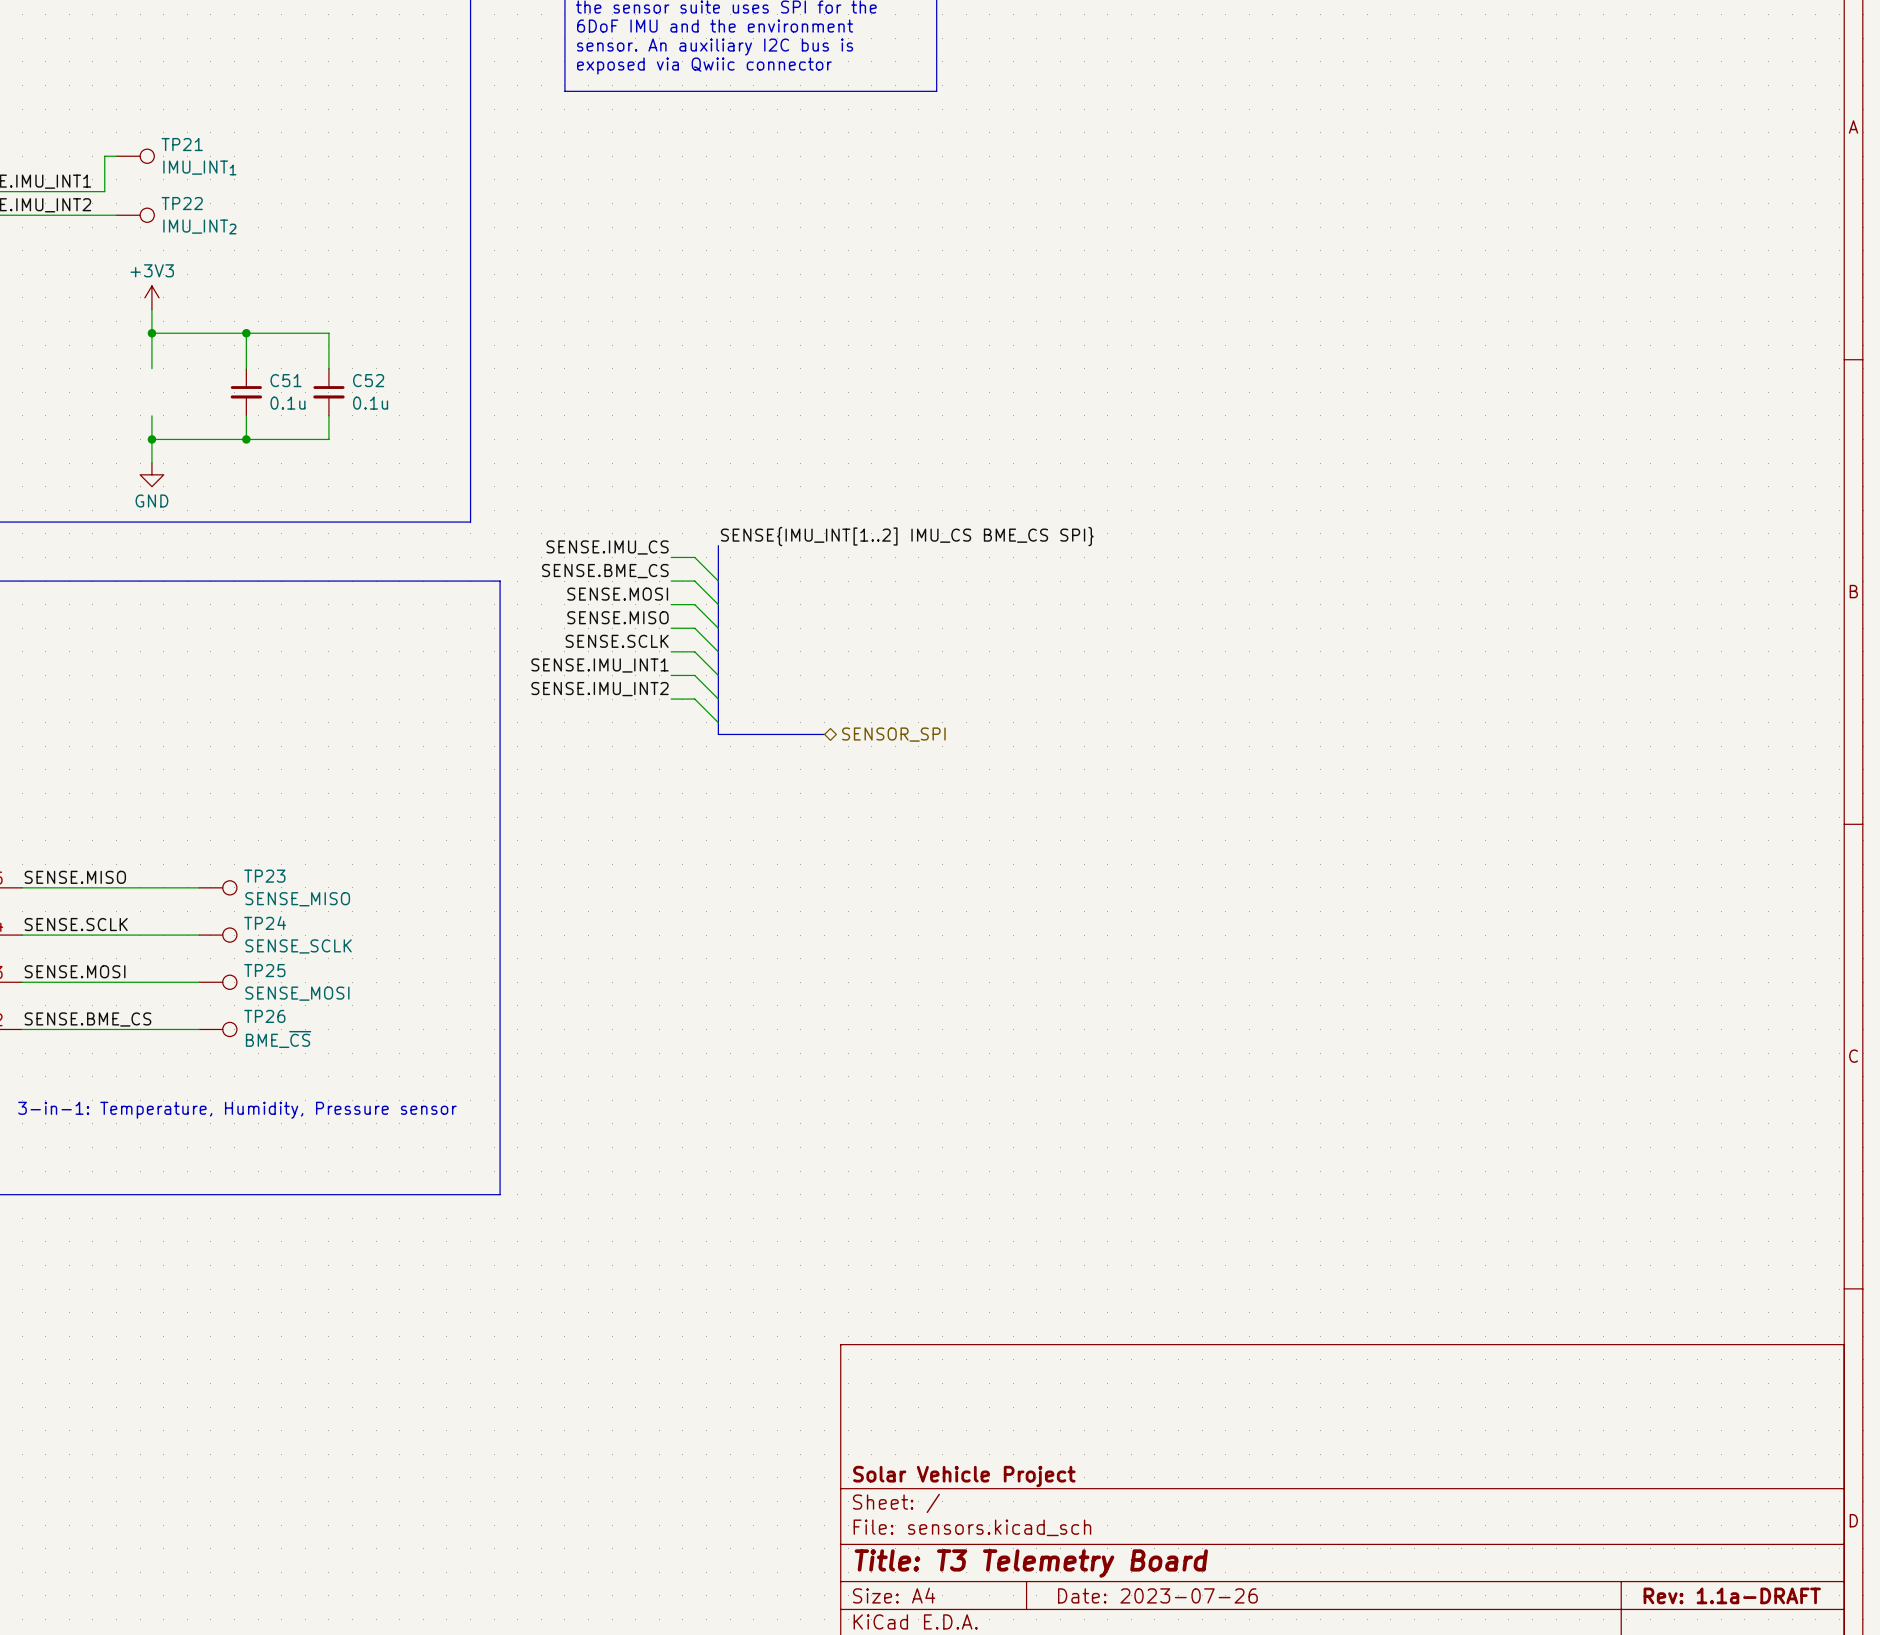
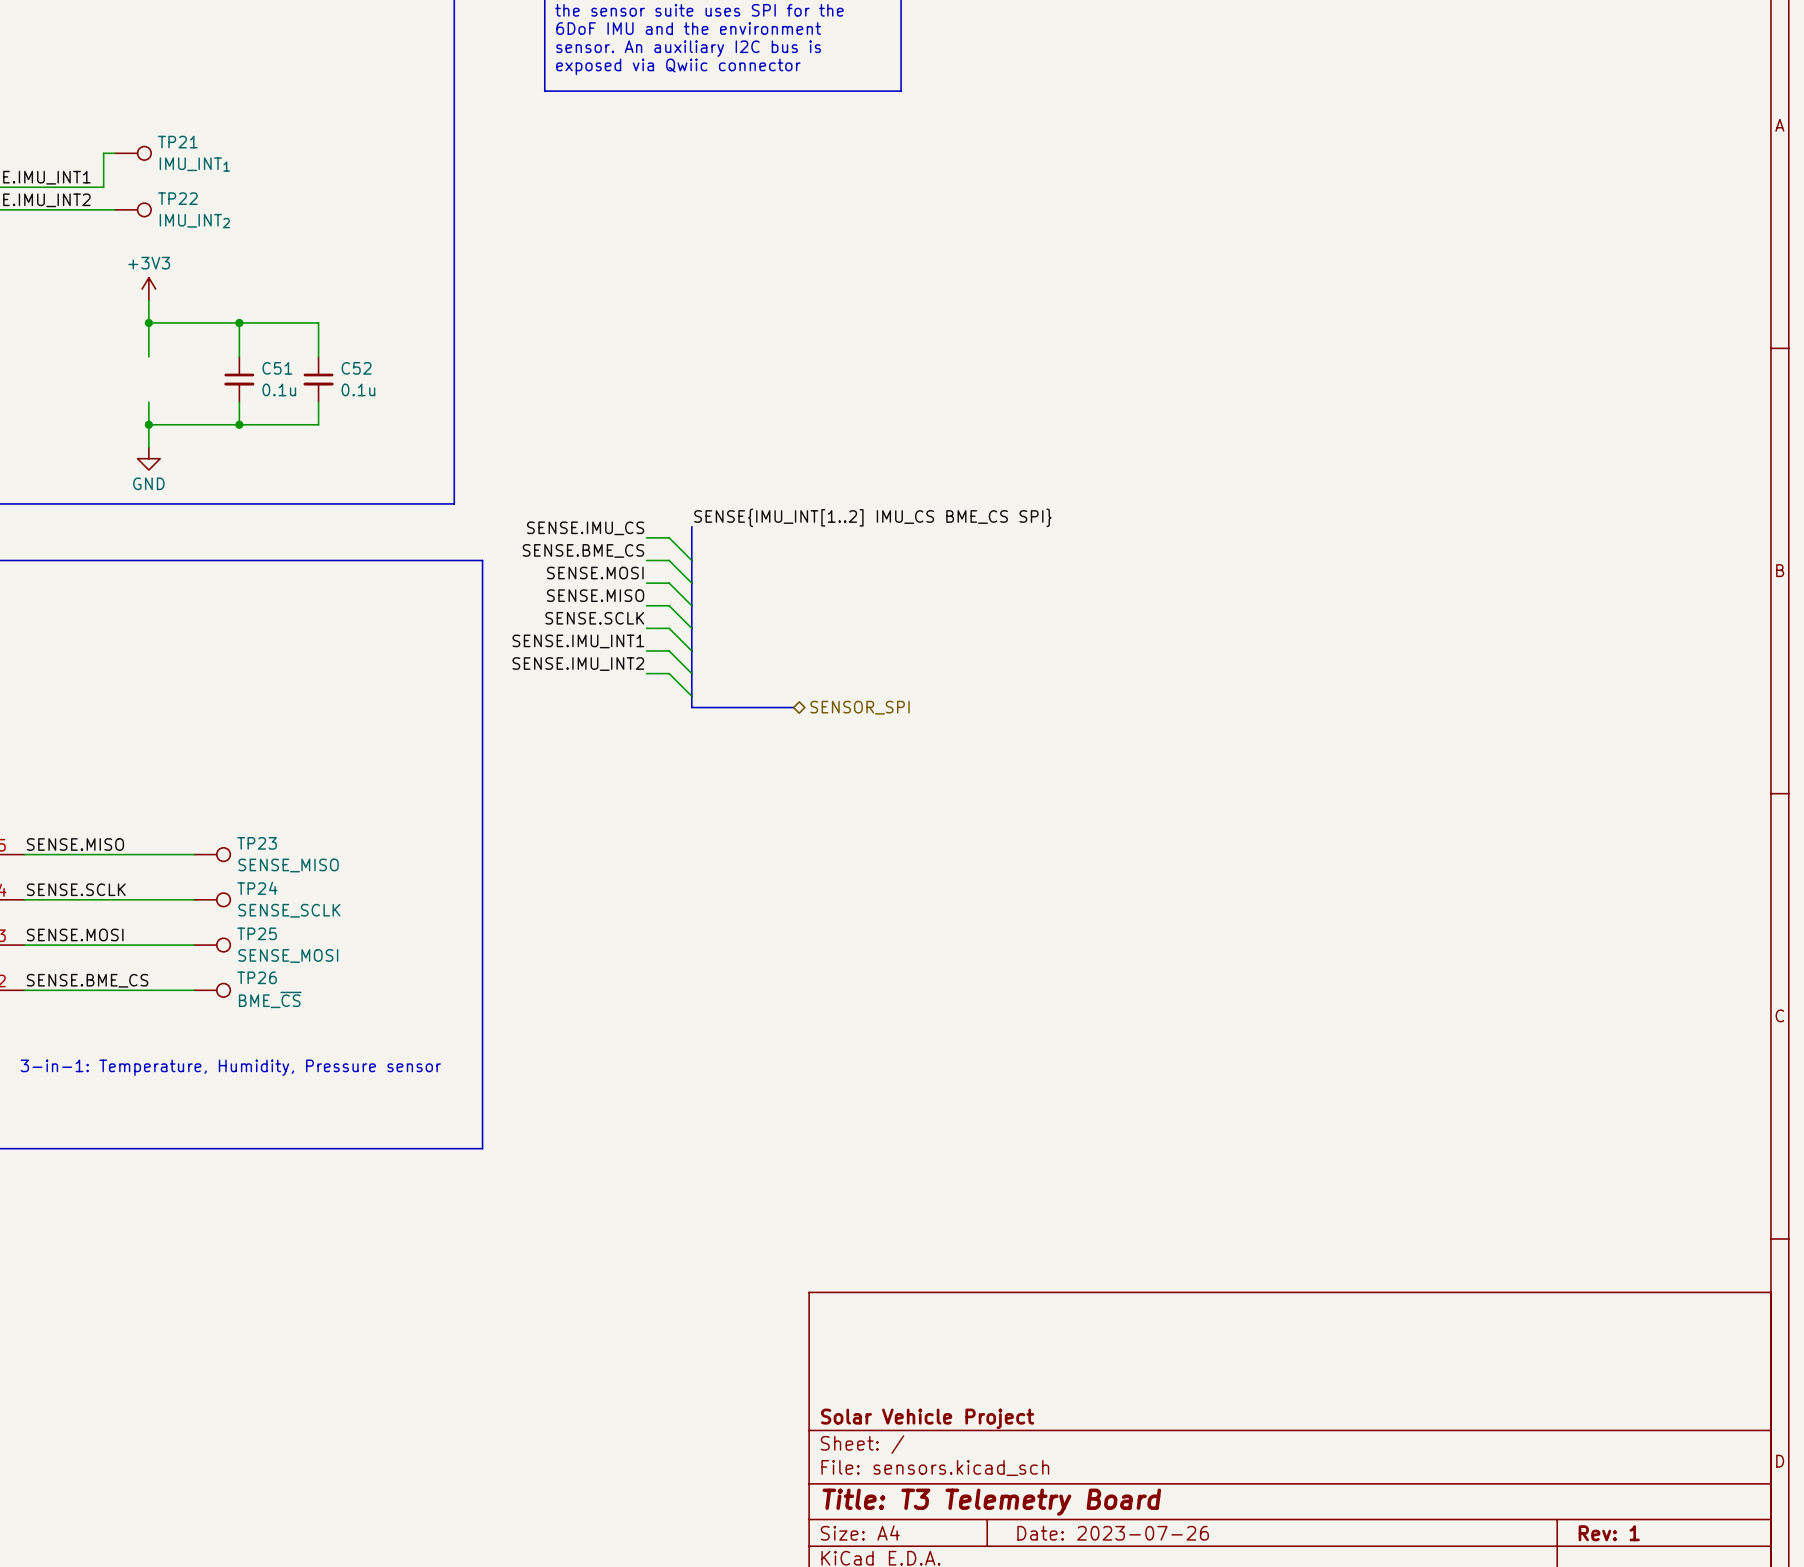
title block: Rev: 1.1a-DRAFT (1732, 1595) -> Rev: 1 (1609, 1533)

